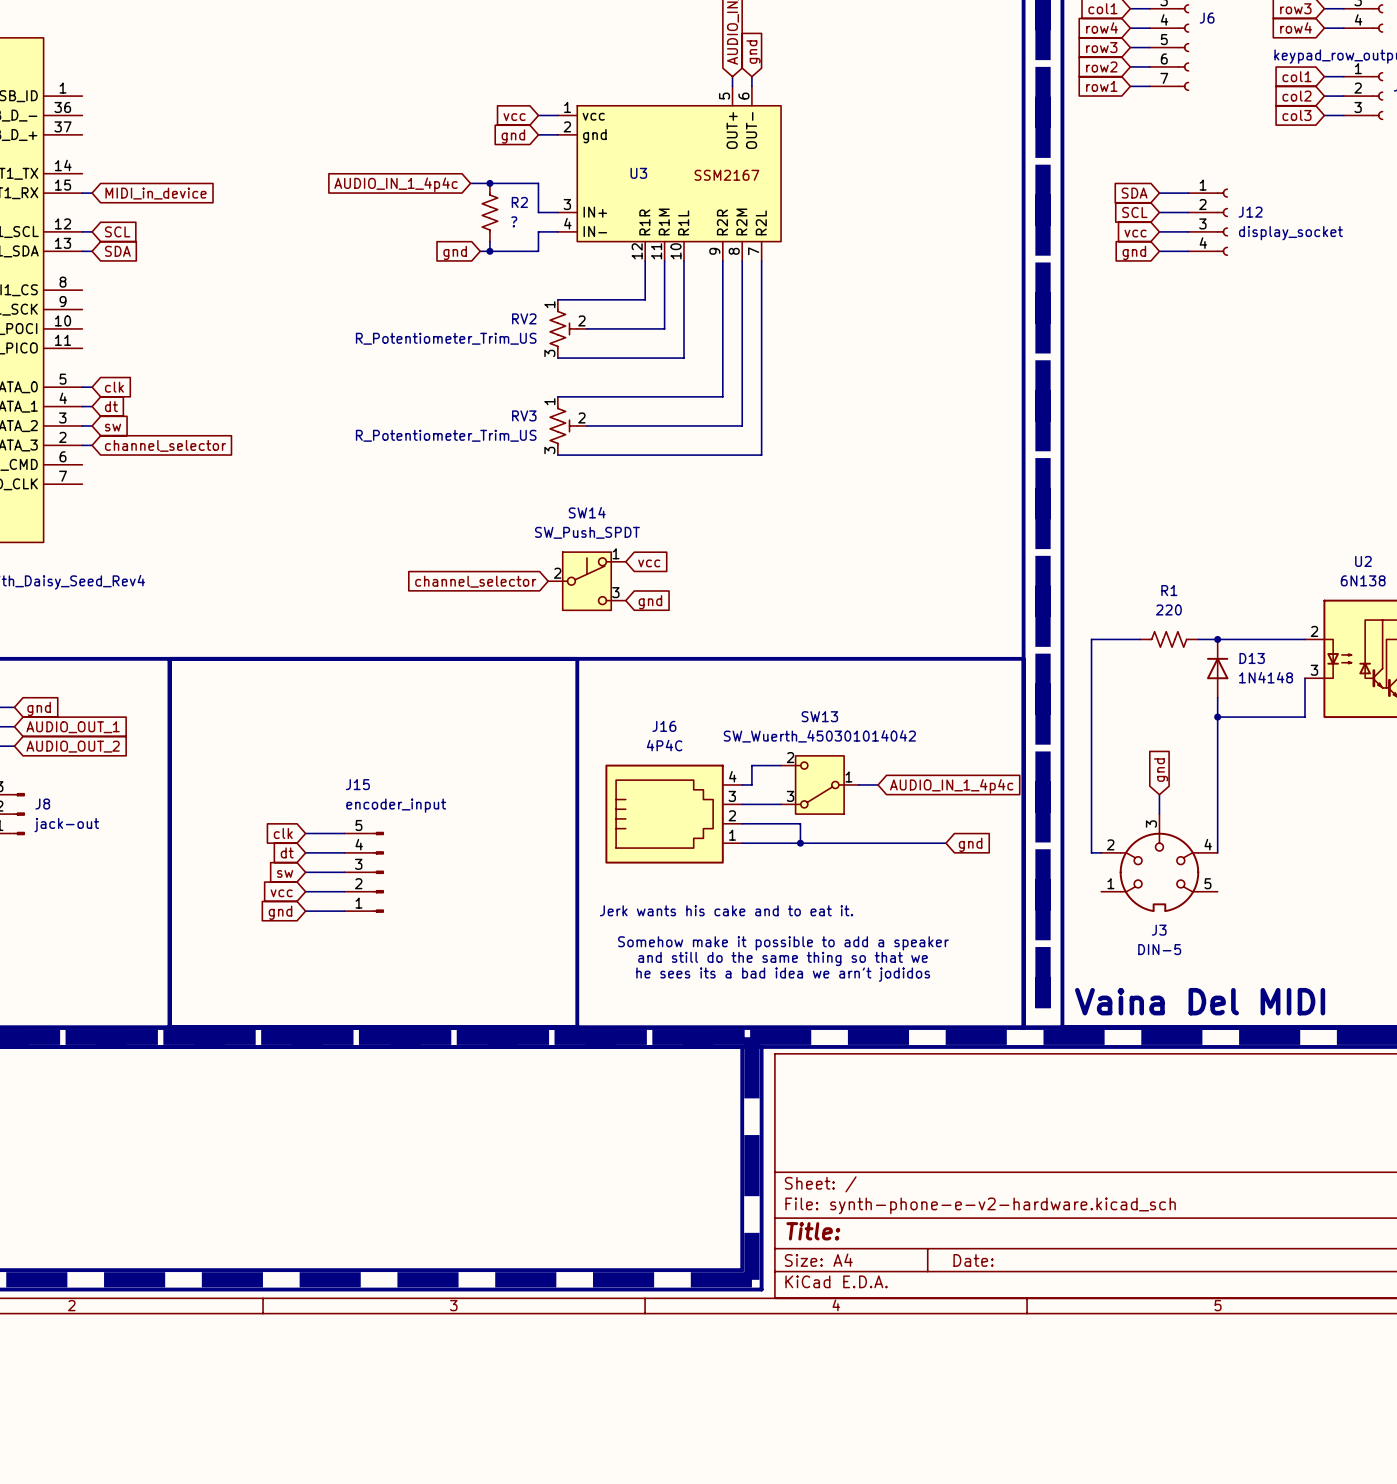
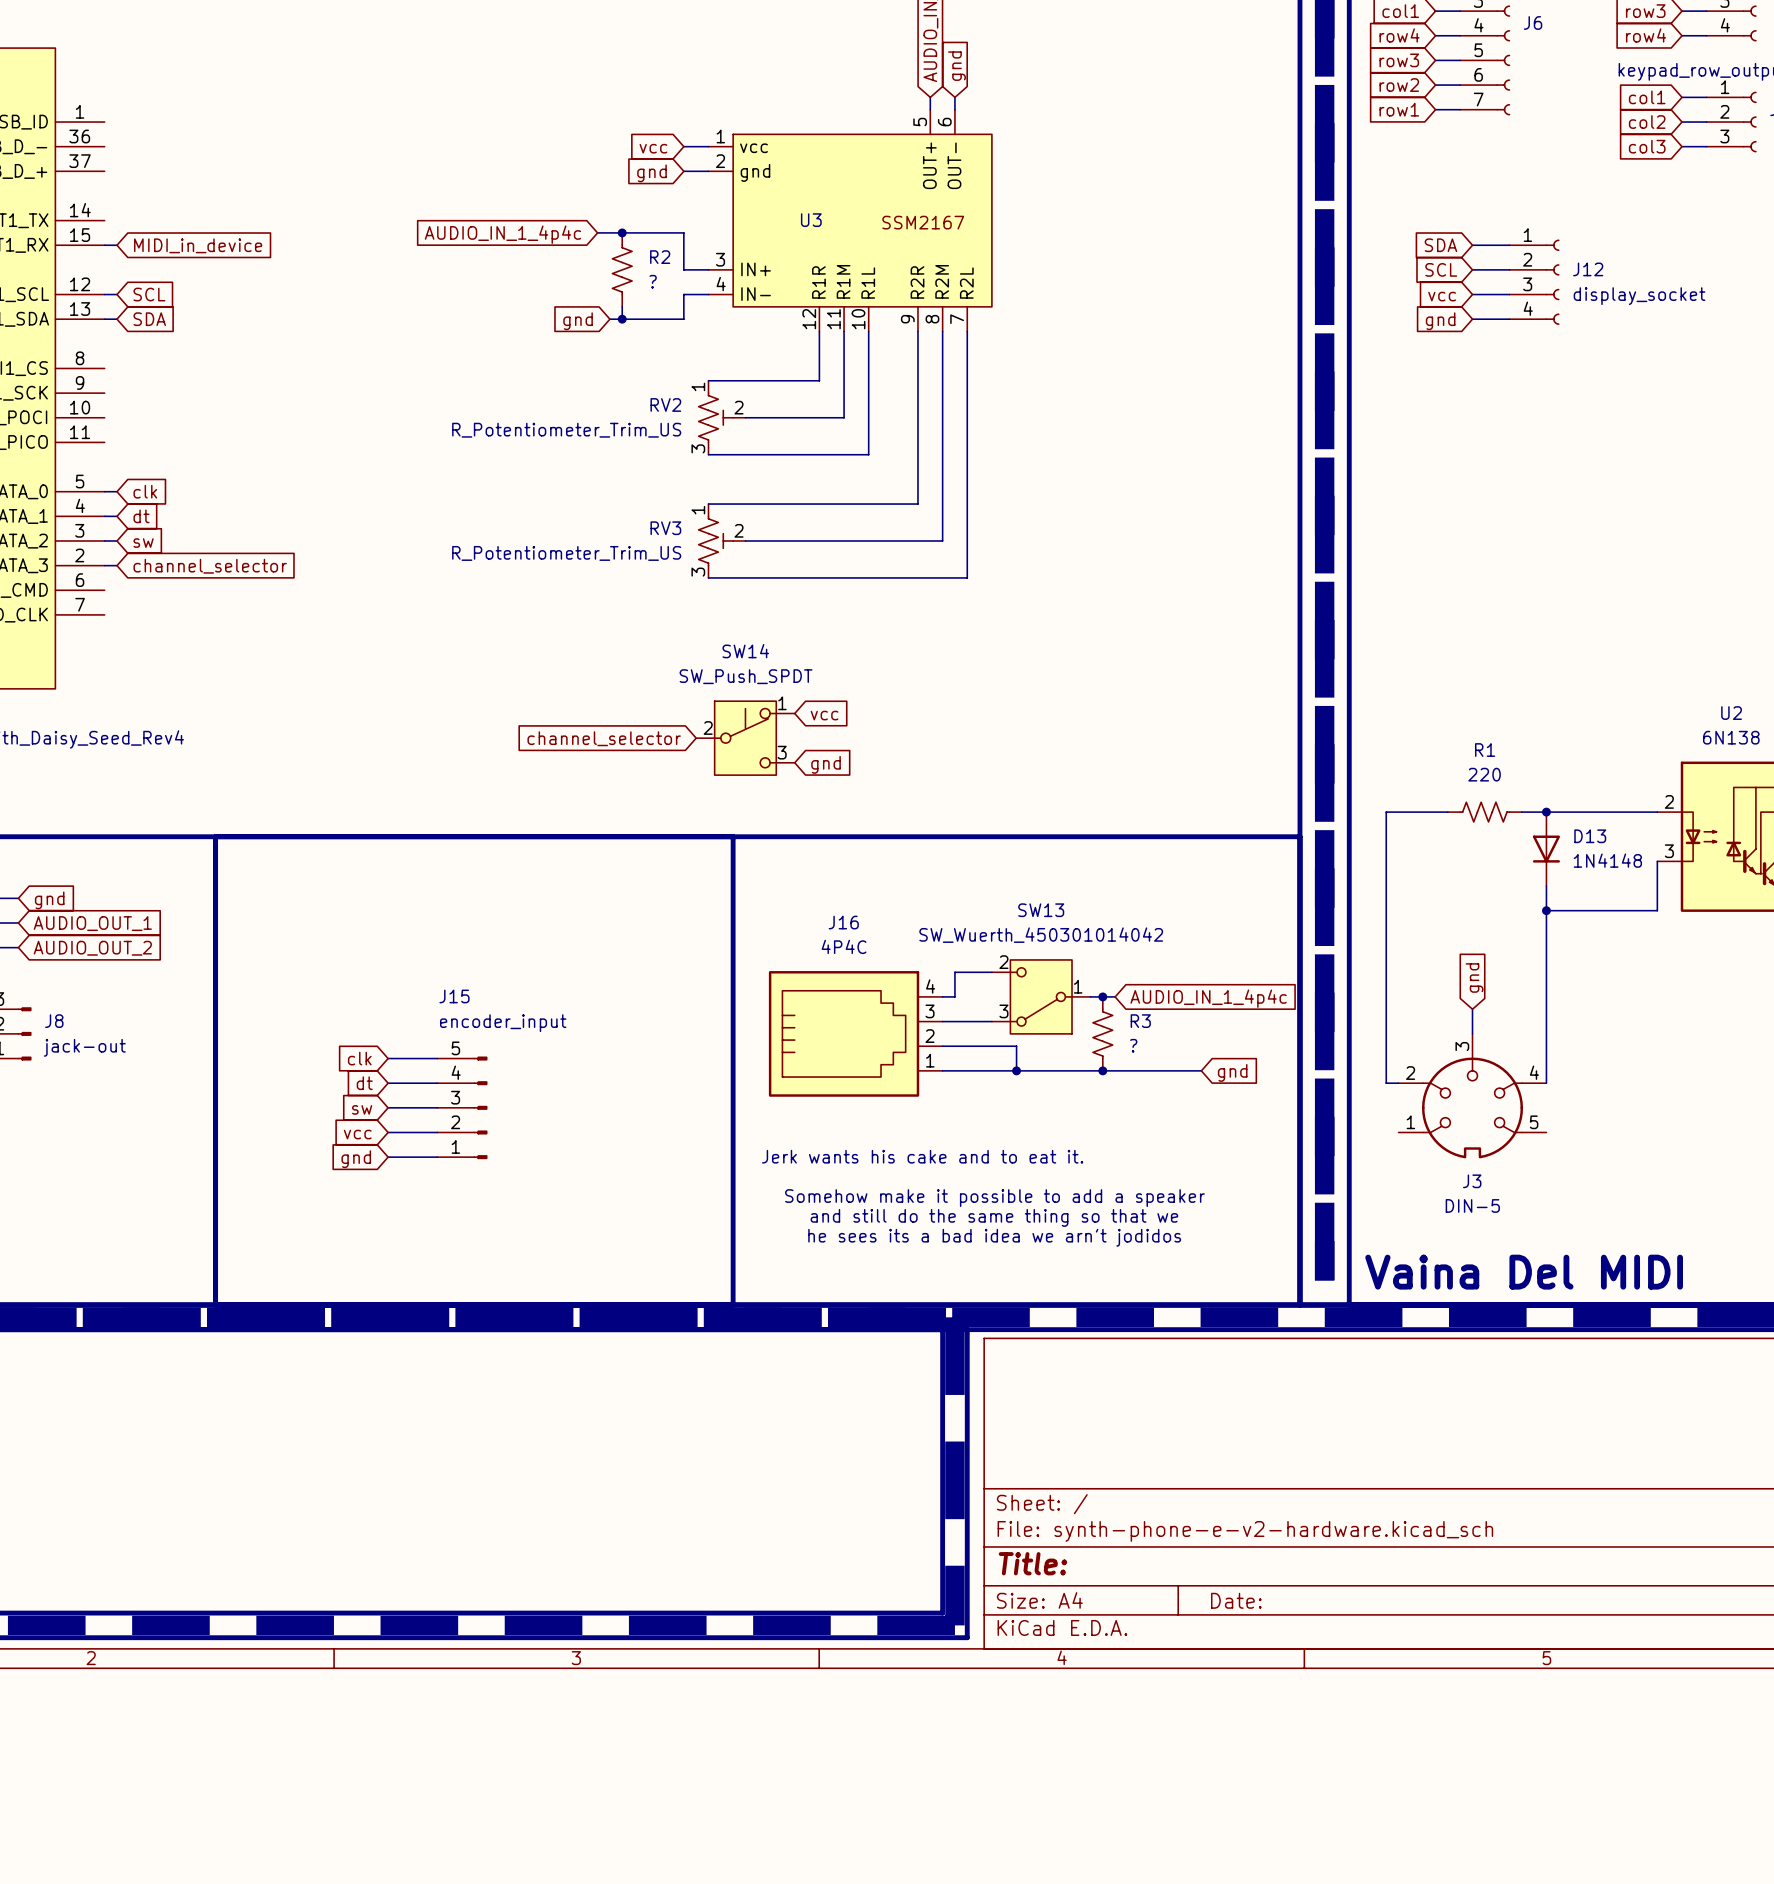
D13 rotation: 0° (1217, 668) -> 180° (1546, 849)
junction: none -> (1102, 996)
R3: none -> ? (1102, 1033)
junction: none -> (1102, 1070)

